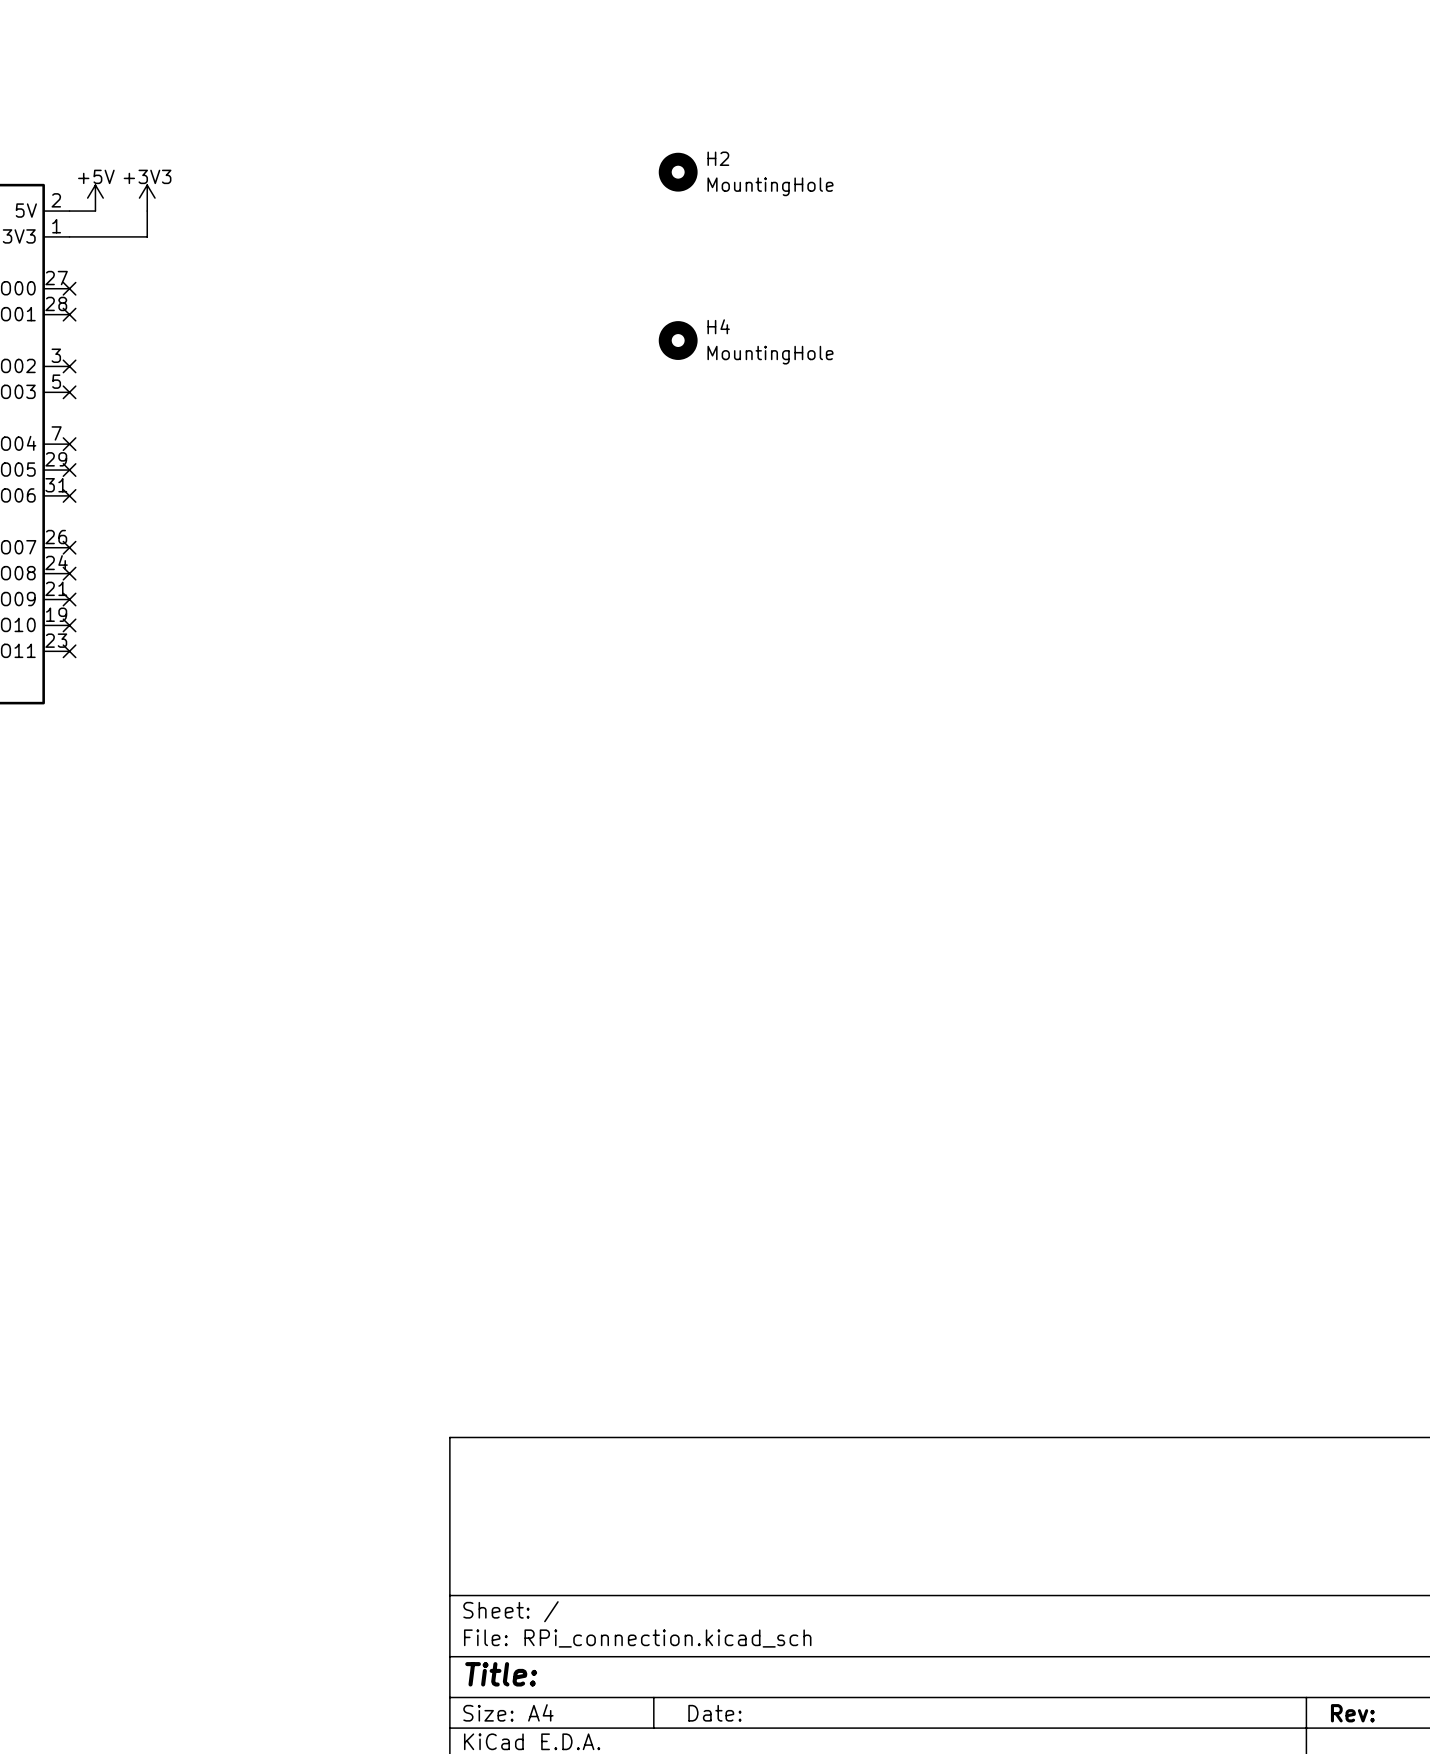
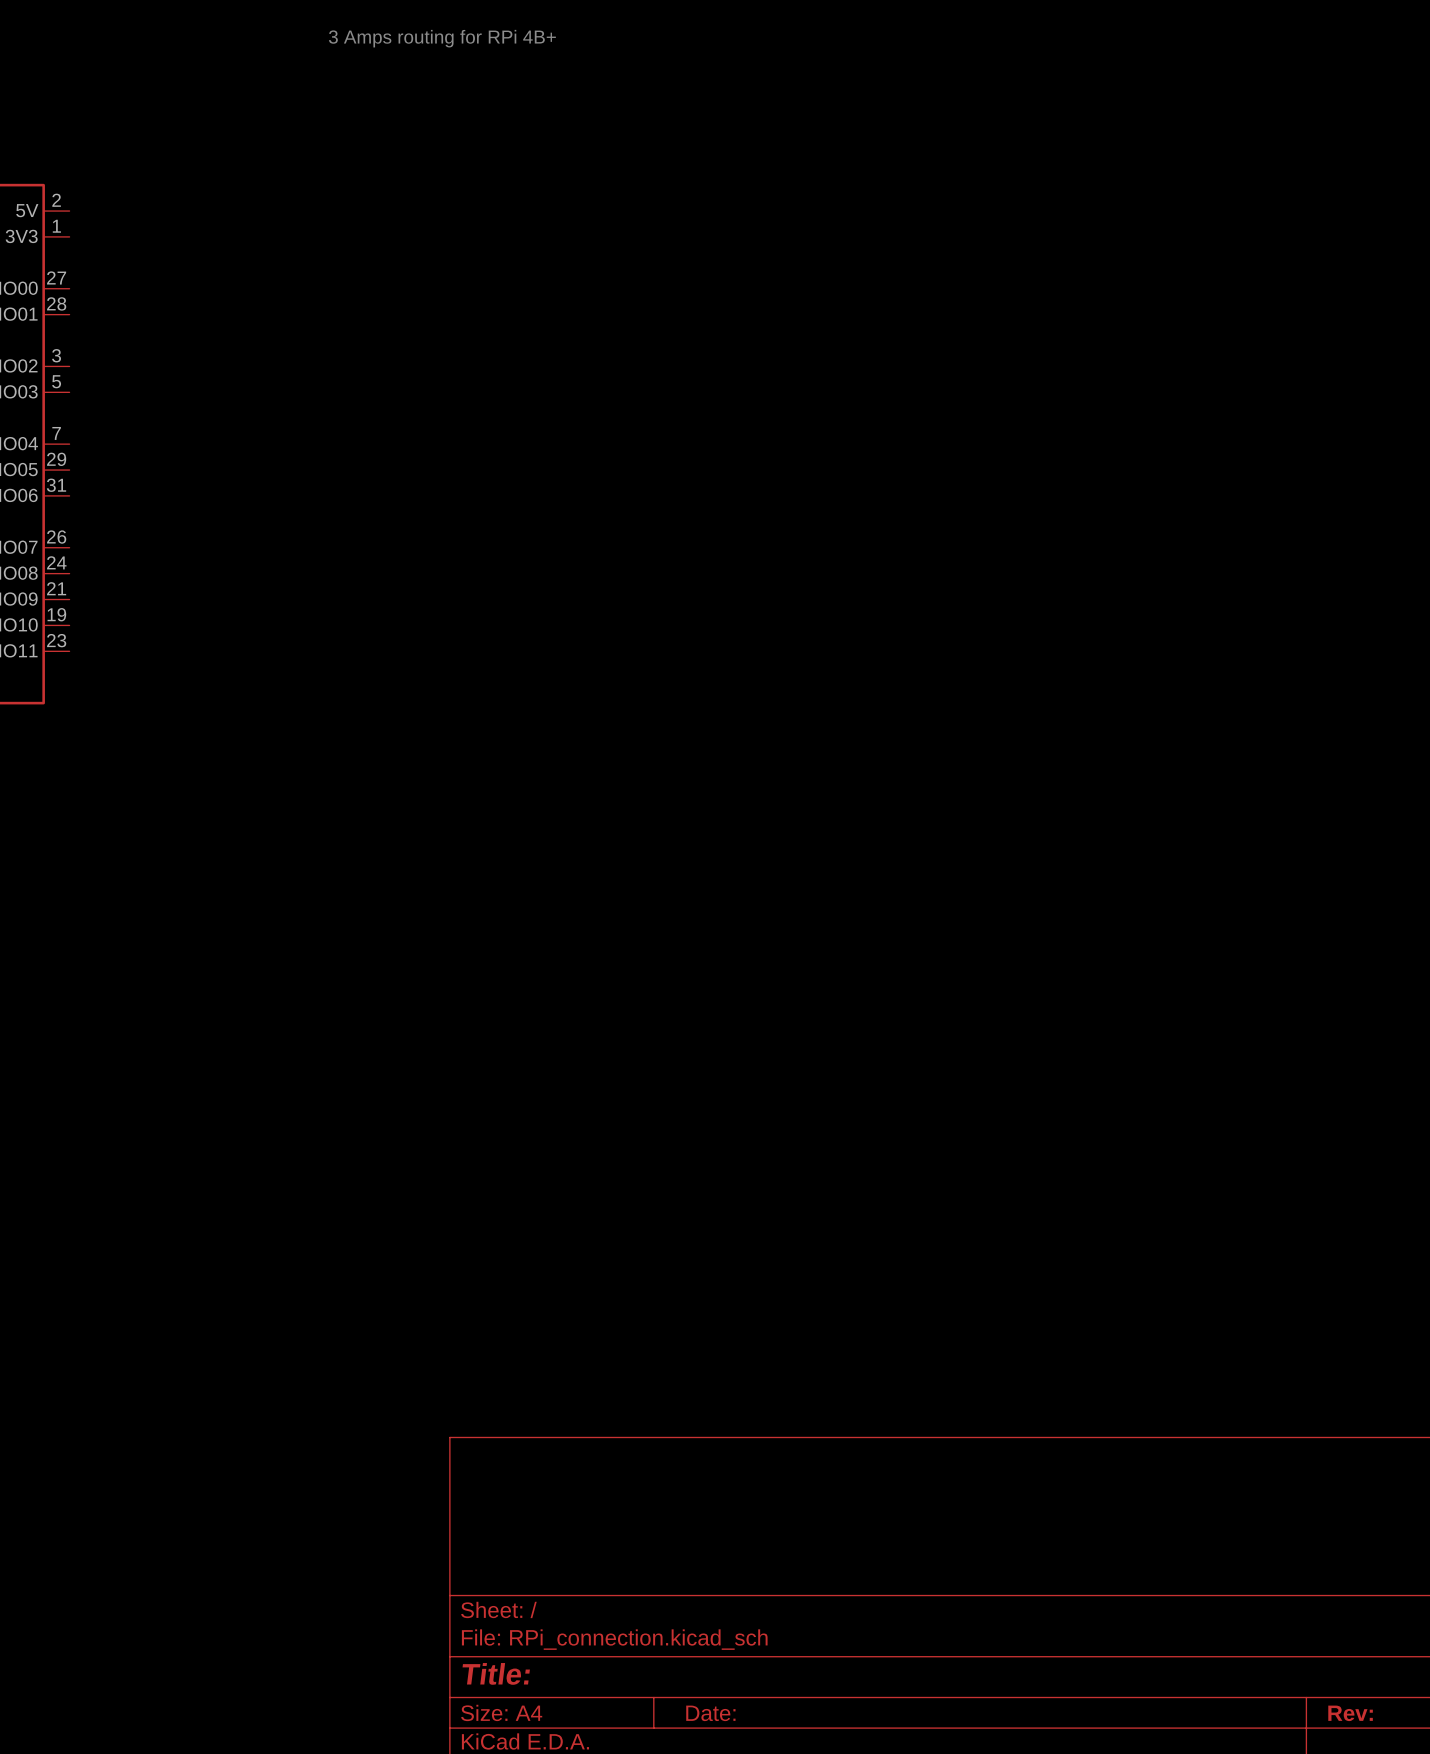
text: none -> 3 Amps routing for RPi 4B+ (442, 38)
H2: MountingHole (678, 172) -> none
power symbol: +5V (95, 198) -> none
power symbol: +3V3 (147, 198) -> none
wire: (69, 211) (95, 211) -> none
wire: (147, 211) (147, 236) (69, 236) -> none
no-connect mark: (69, 288) -> none
no-connect mark: (69, 314) -> none
H4: MountingHole (678, 340) -> none
no-connect mark: (69, 366) -> none
no-connect mark: (69, 392) -> none
no-connect mark: (69, 444) -> none
no-connect mark: (69, 470) -> none
no-connect mark: (69, 495) -> none
no-connect mark: (69, 547) -> none
no-connect mark: (69, 573) -> none
no-connect mark: (69, 599) -> none
no-connect mark: (69, 625) -> none
no-connect mark: (69, 651) -> none

